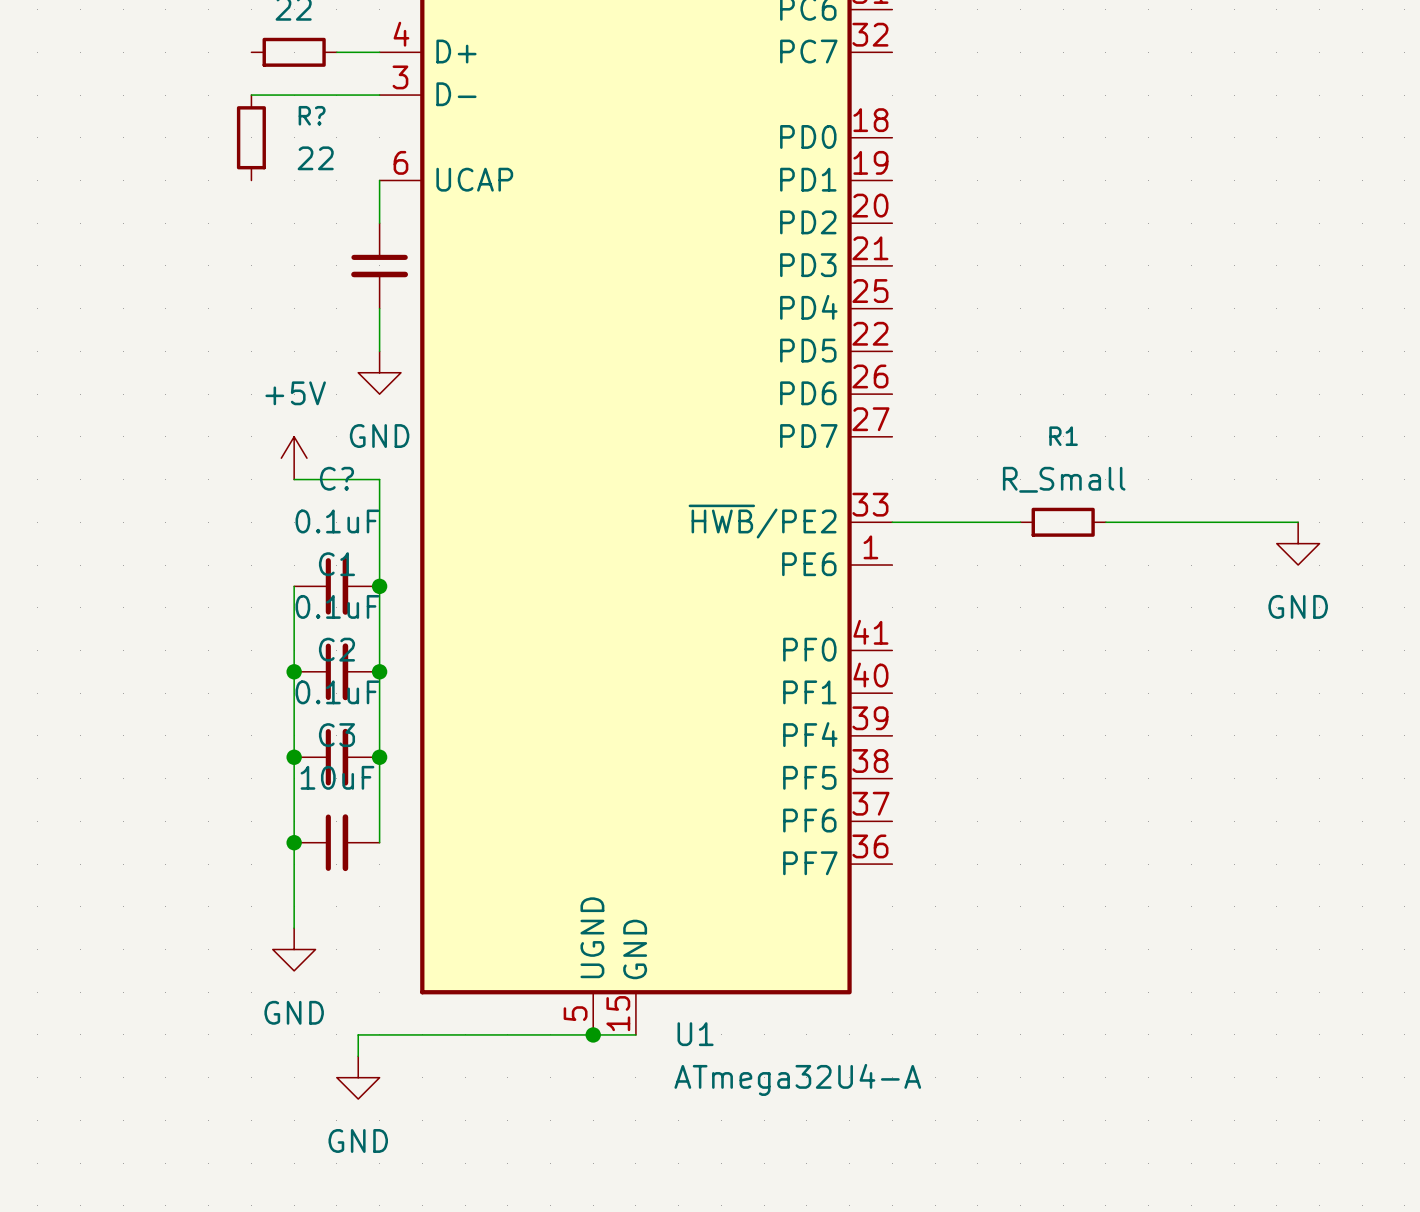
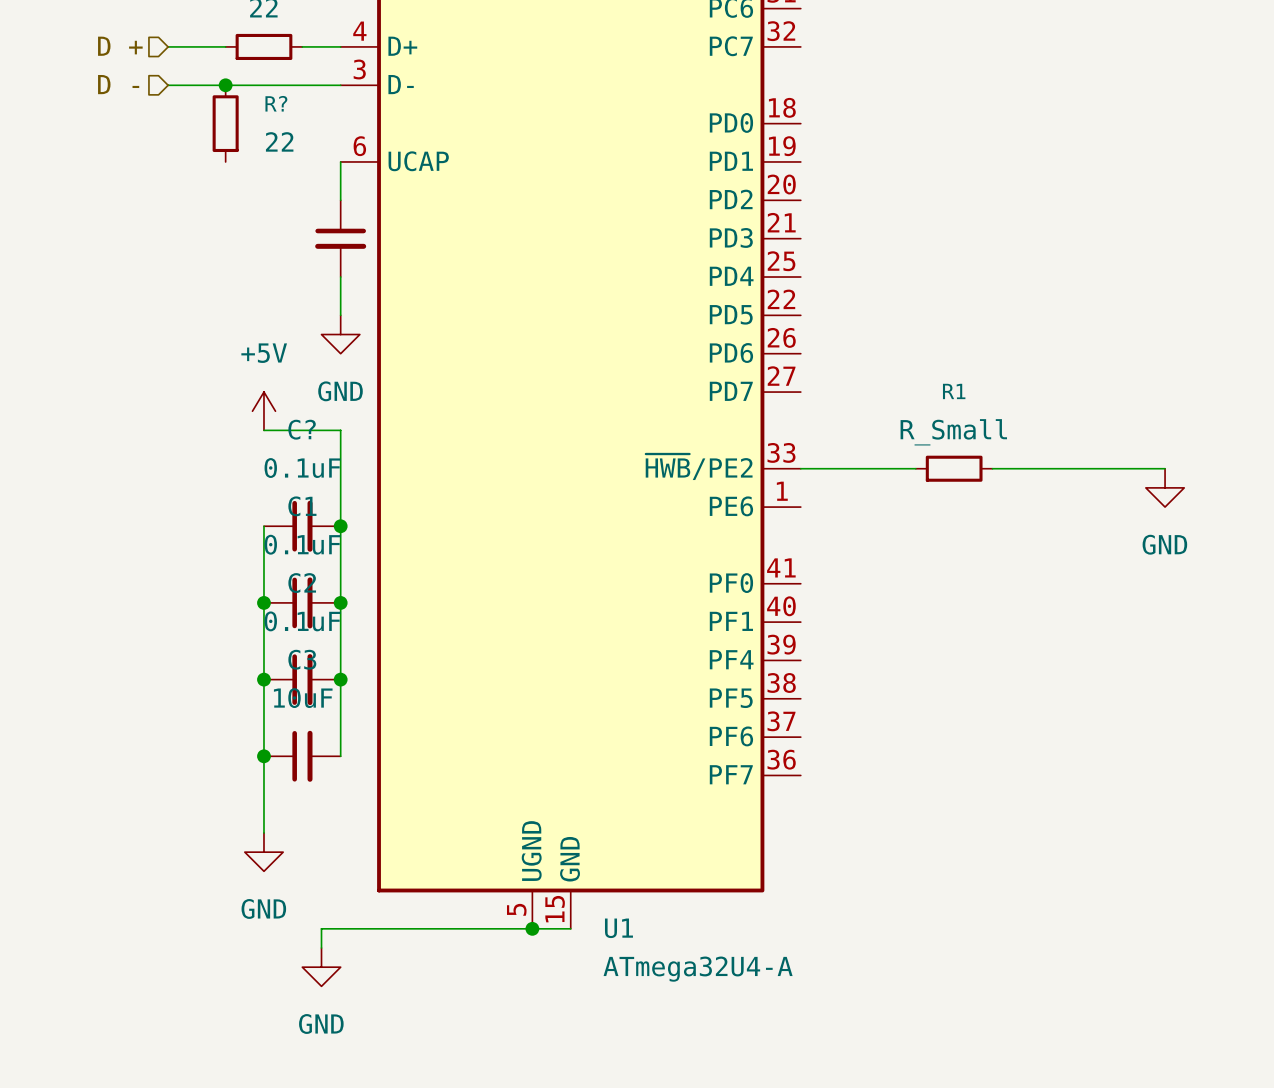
hierarchical label: none -> D + (120, 46)
wire: none -> (168, 46) (225, 46)
hierarchical label: none -> D - (118, 84)
wire: none -> (168, 85) (225, 85)
junction: none -> (225, 85)

